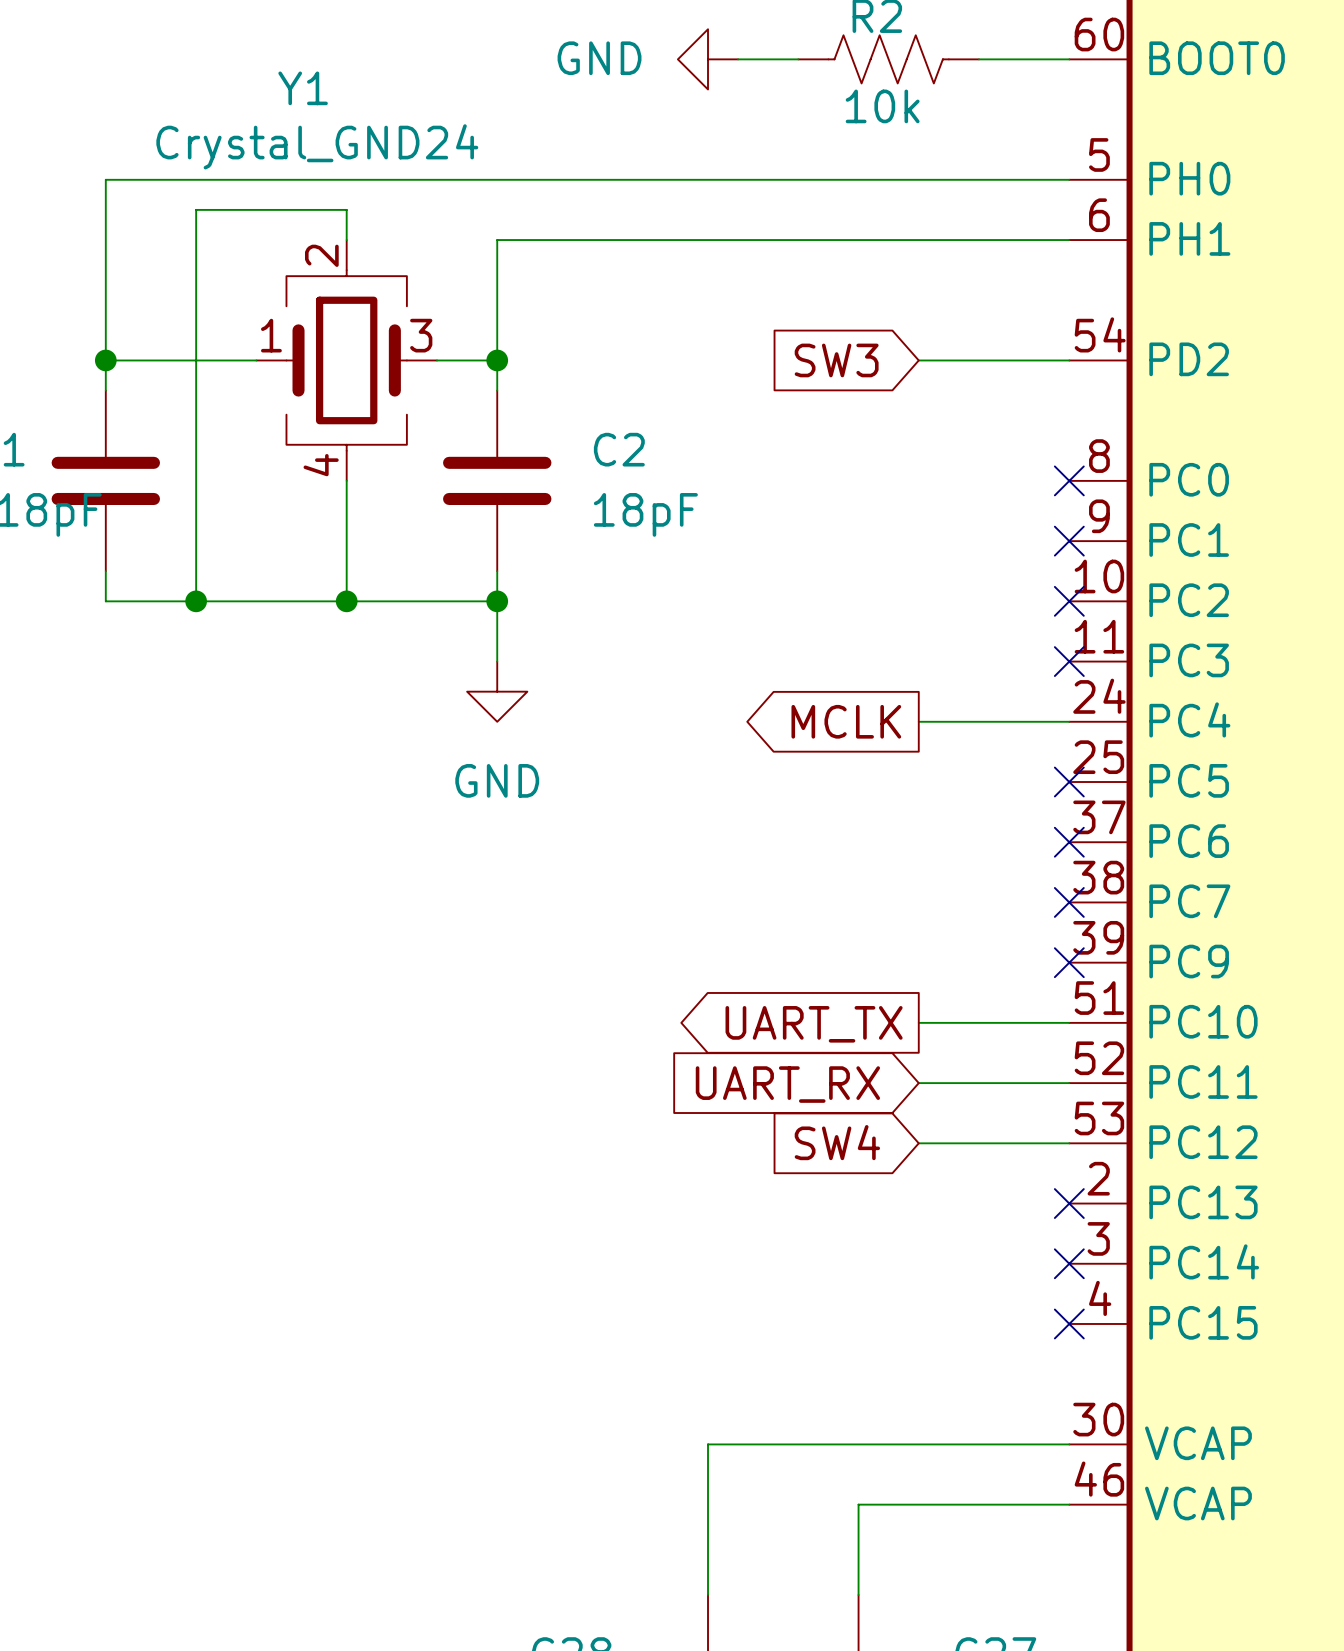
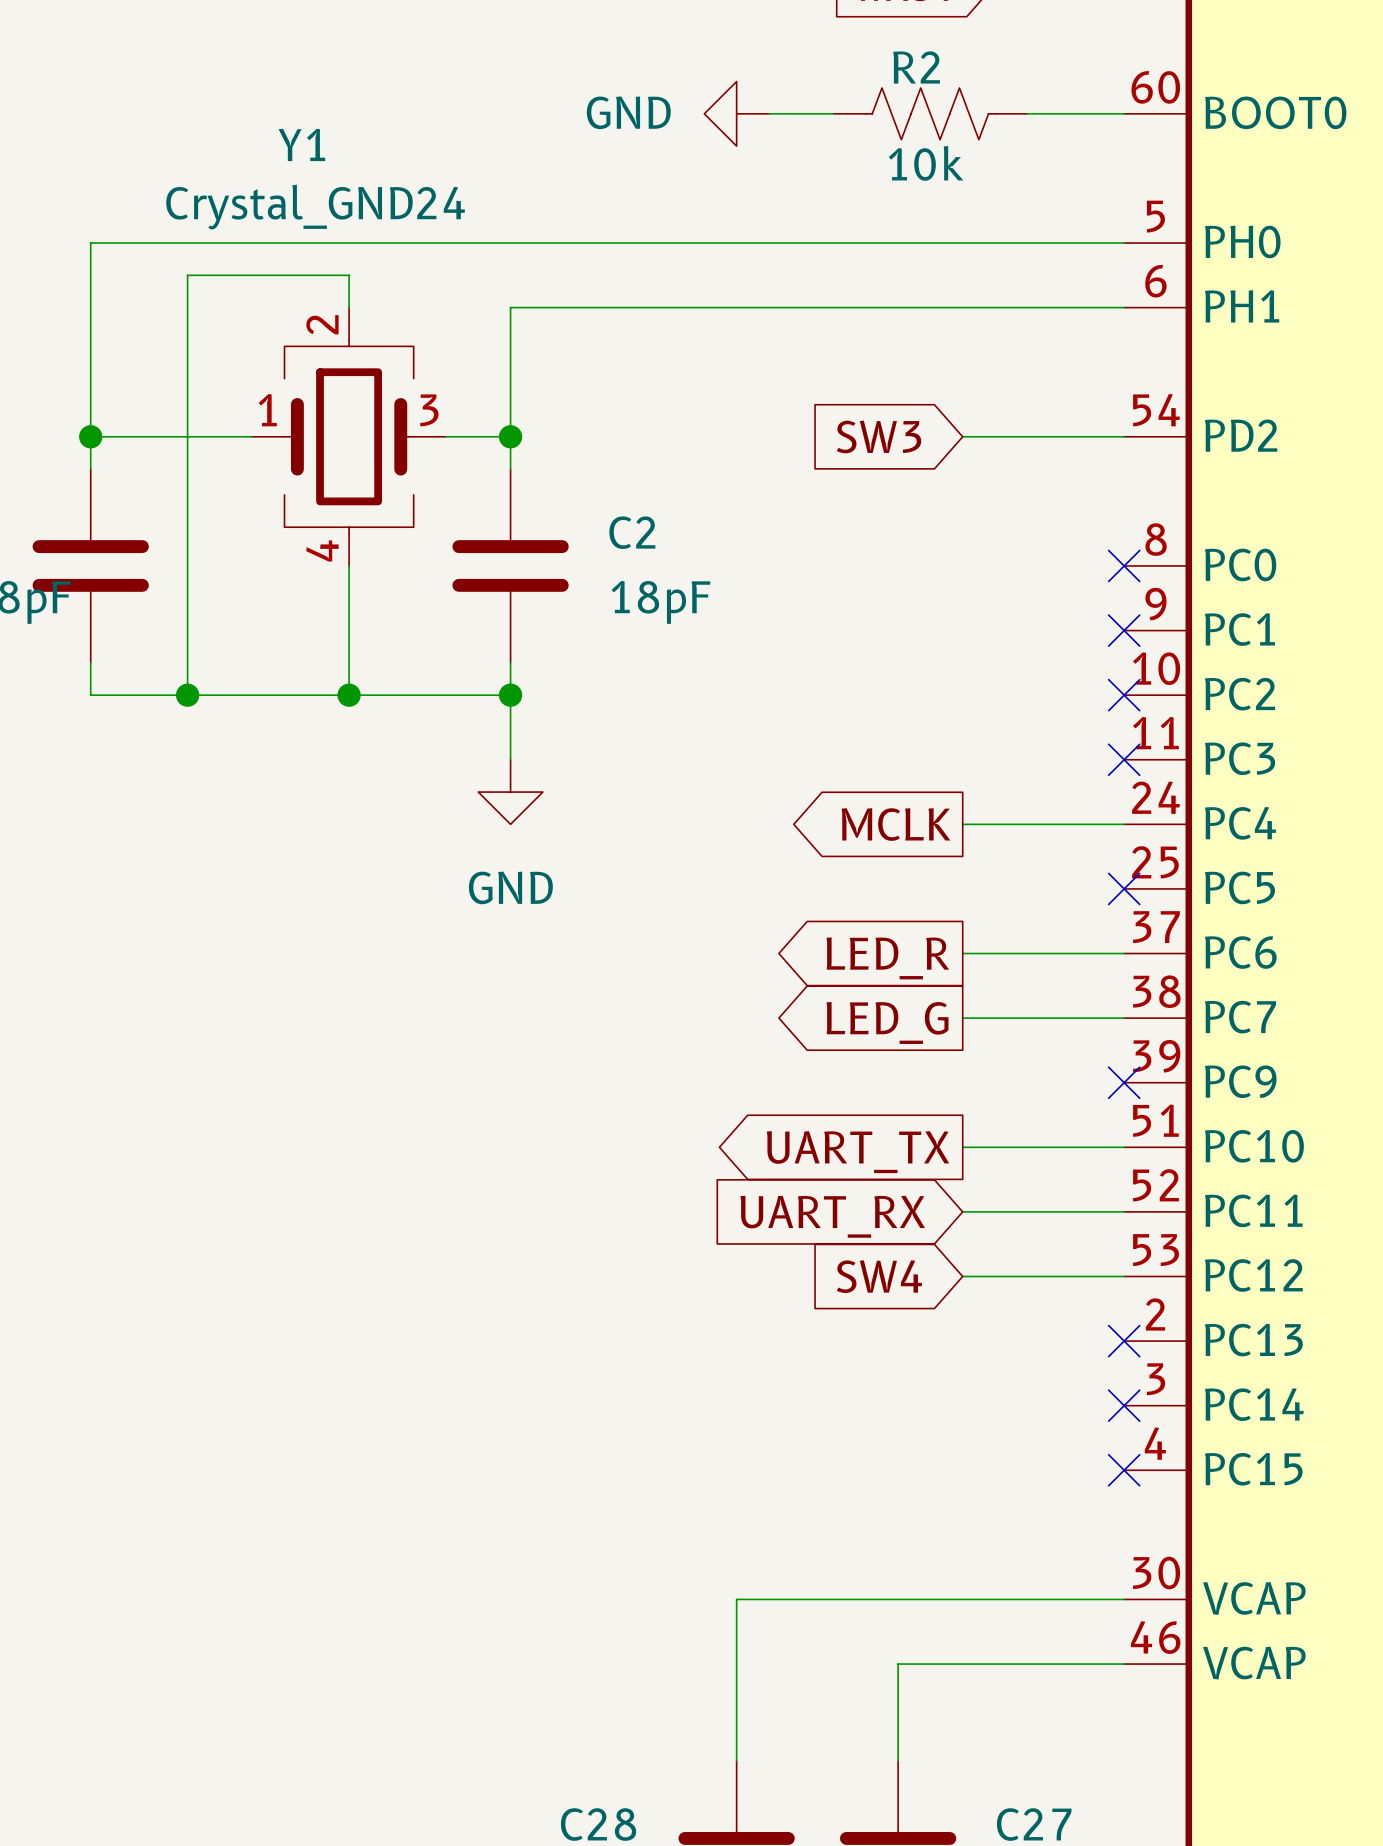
wire: none -> (962, 953) (1124, 953)
no-connect mark: (1069, 842) -> none
global label: none -> LED_R (887, 958)
wire: none -> (962, 1018) (1124, 1018)
no-connect mark: (1069, 902) -> none
global label: none -> LED_G (887, 1022)

